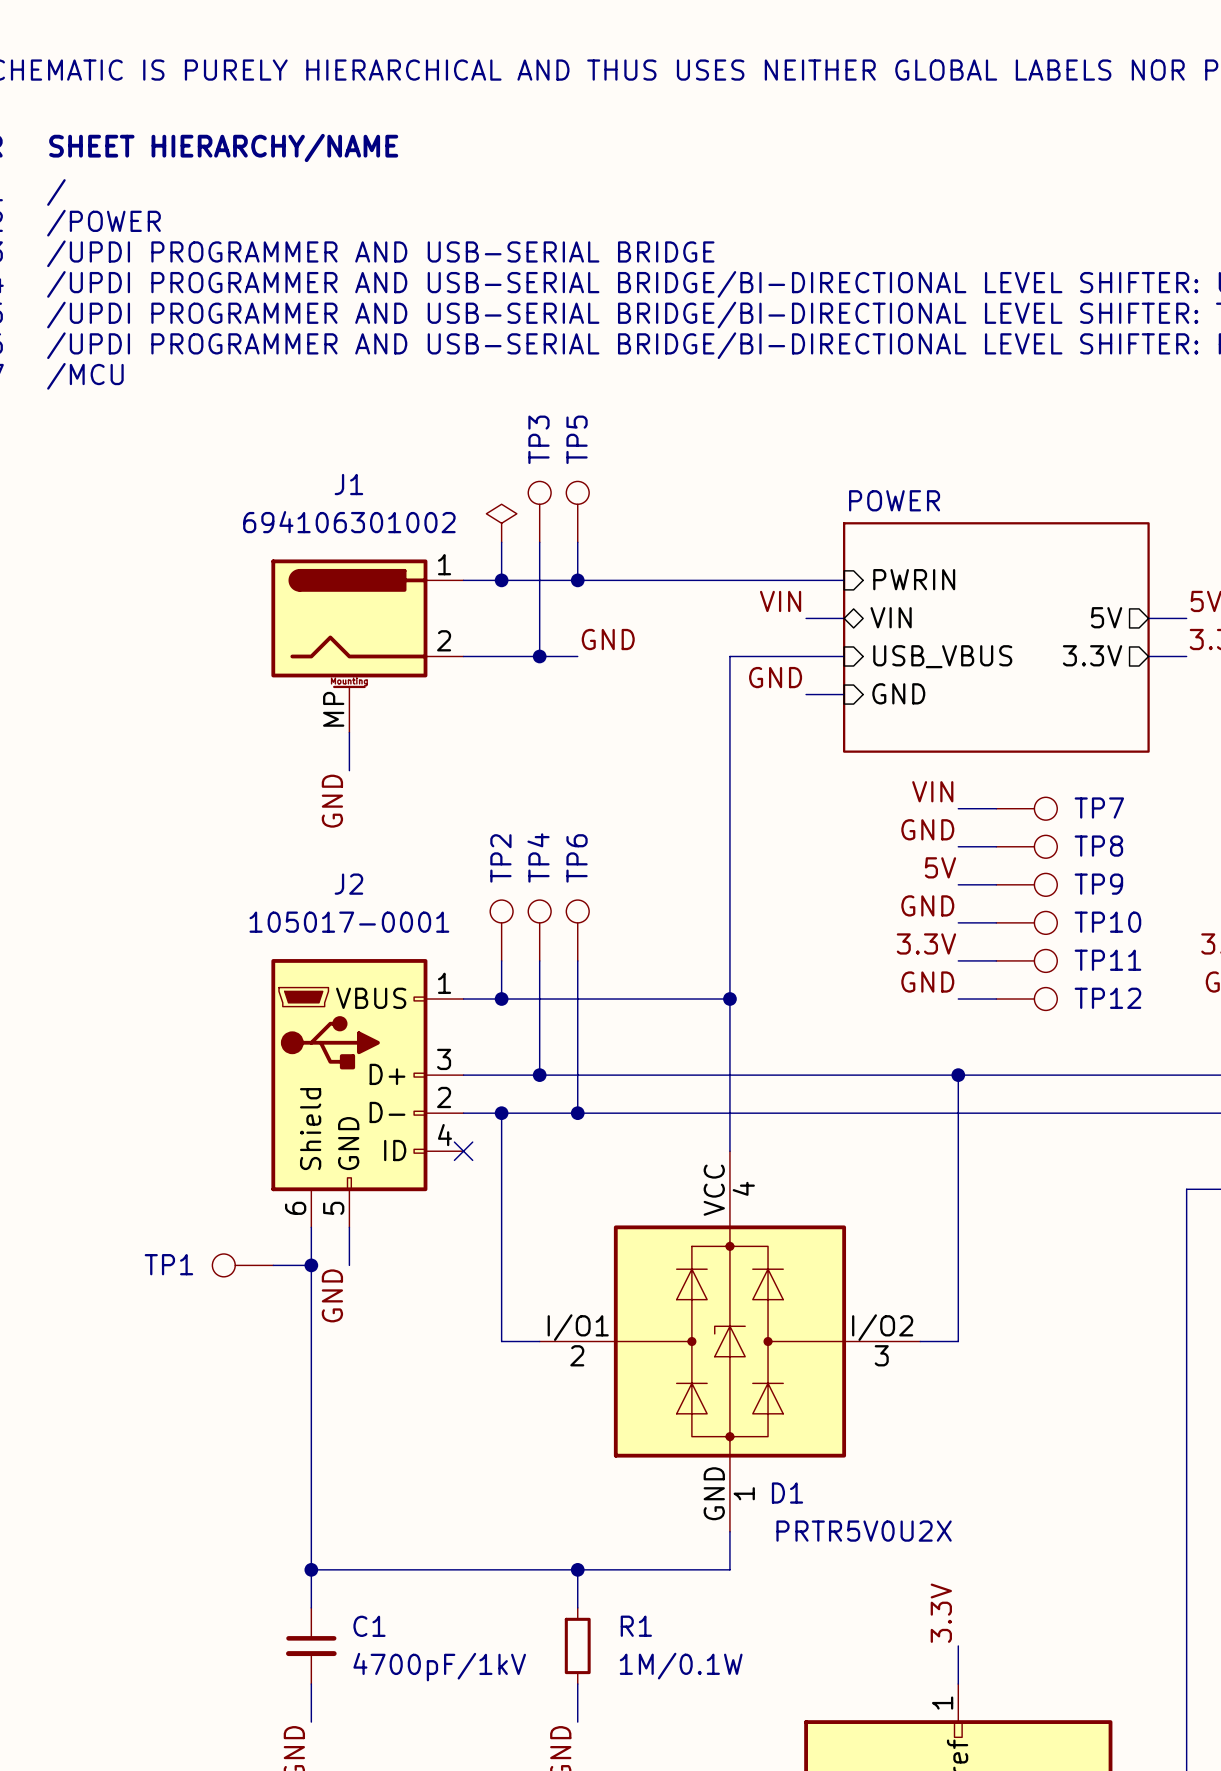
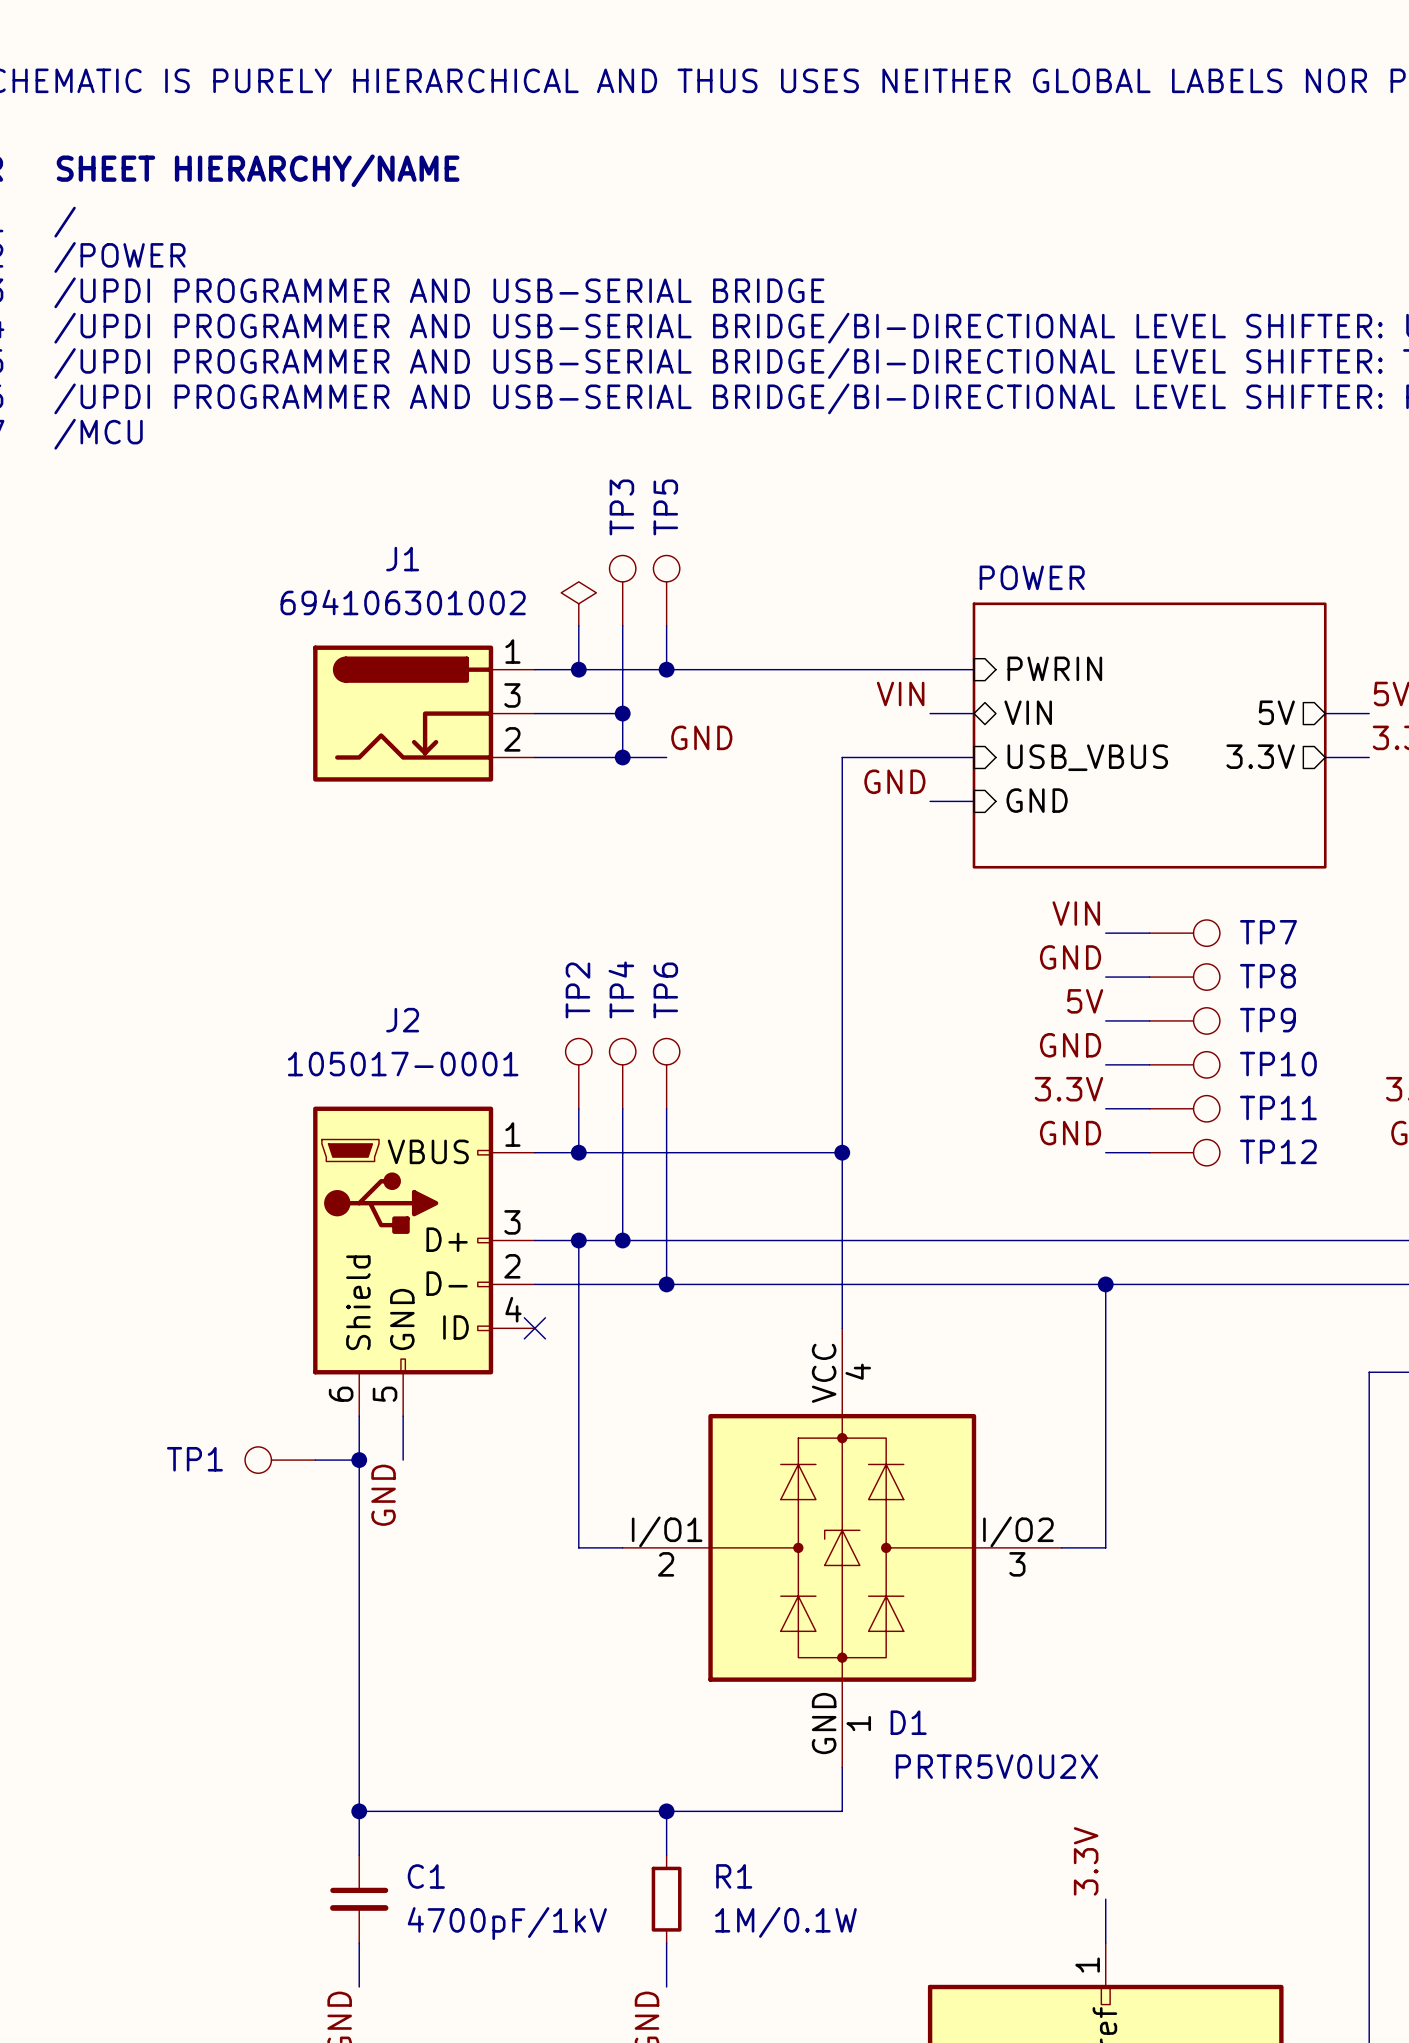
J1 symbol: [271, 559, 464, 733] -> [313, 645, 535, 782]
wire: none -> (534, 713) (622, 713)
junction: none -> (622, 713)
wire: (349, 732) (349, 770) -> none
label: GND (332, 801) -> none
wire: none -> (578, 1240) (578, 1284)
wire: (958, 1075) (958, 1113) -> none
junction position: (958, 1075) -> (1105, 1284)
junction position: (501, 1113) -> (578, 1240)

